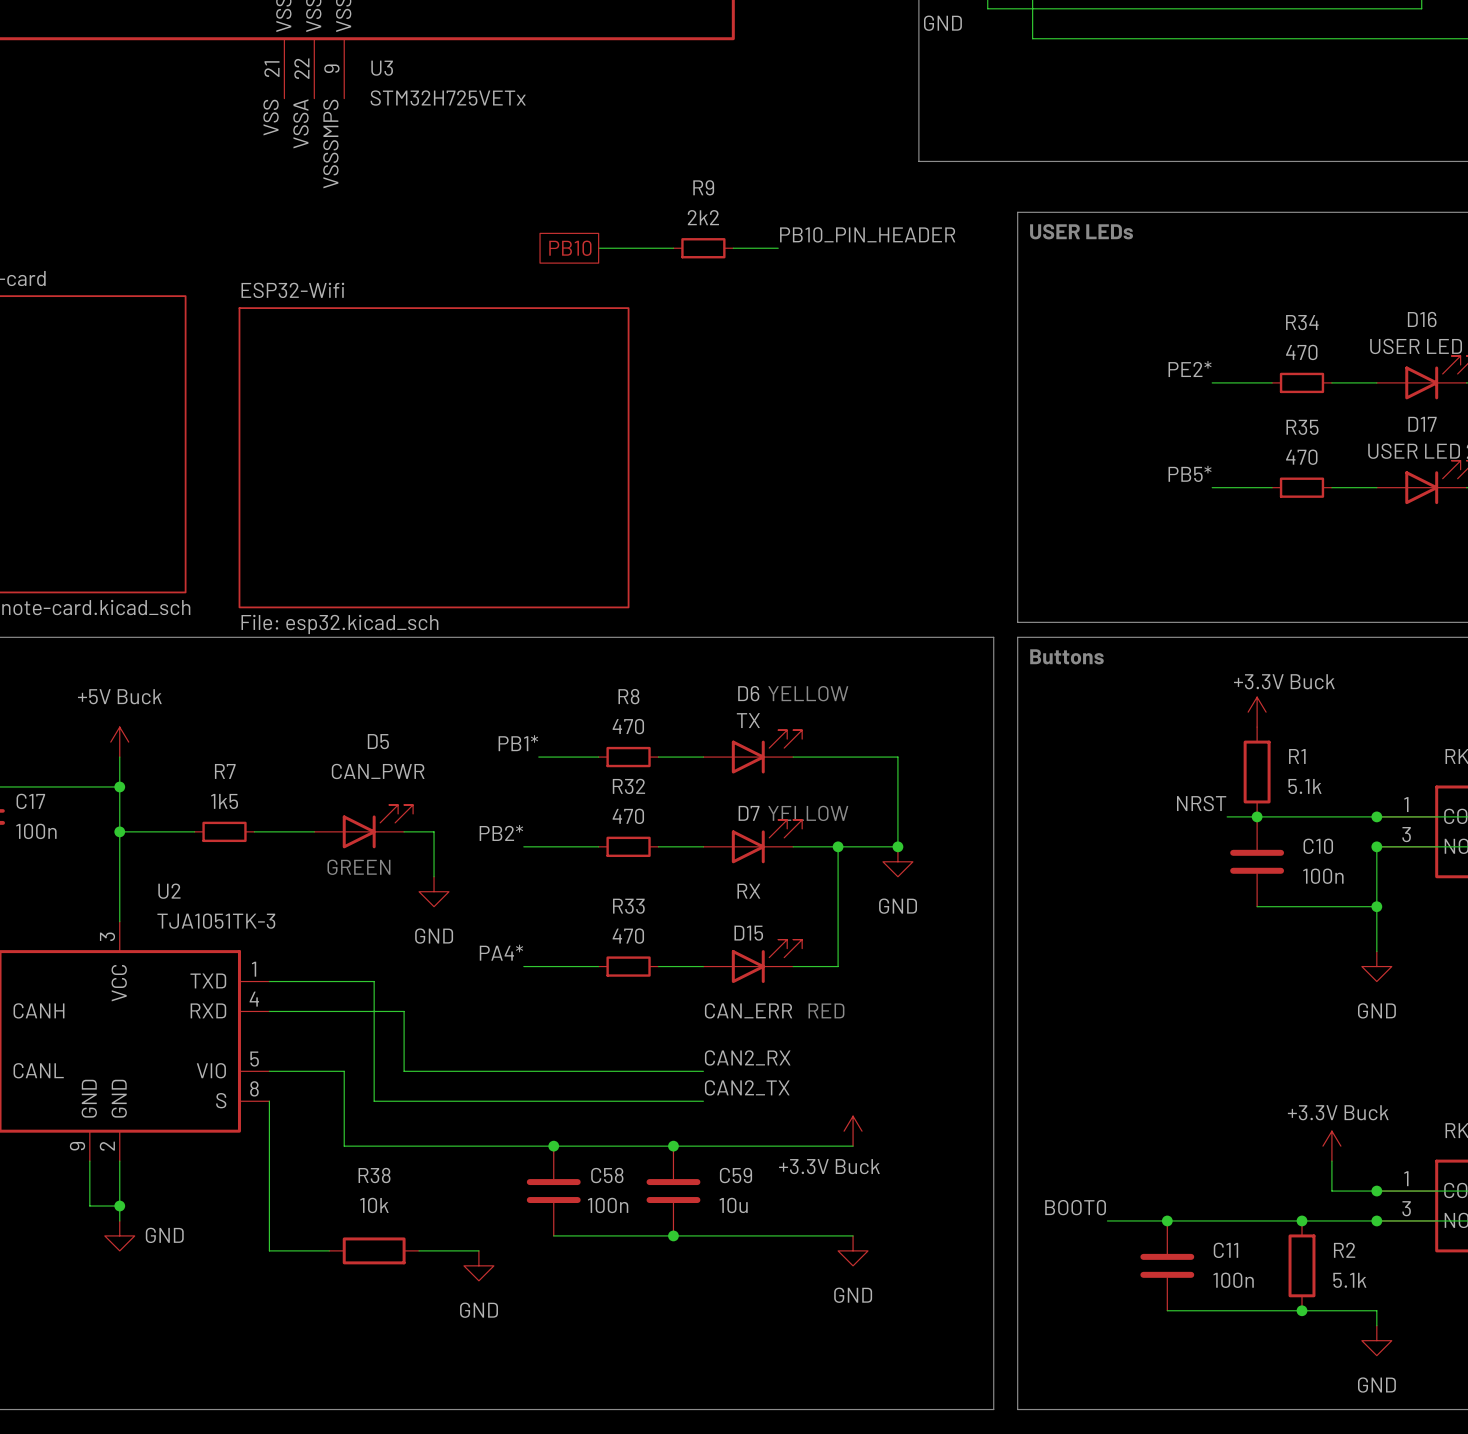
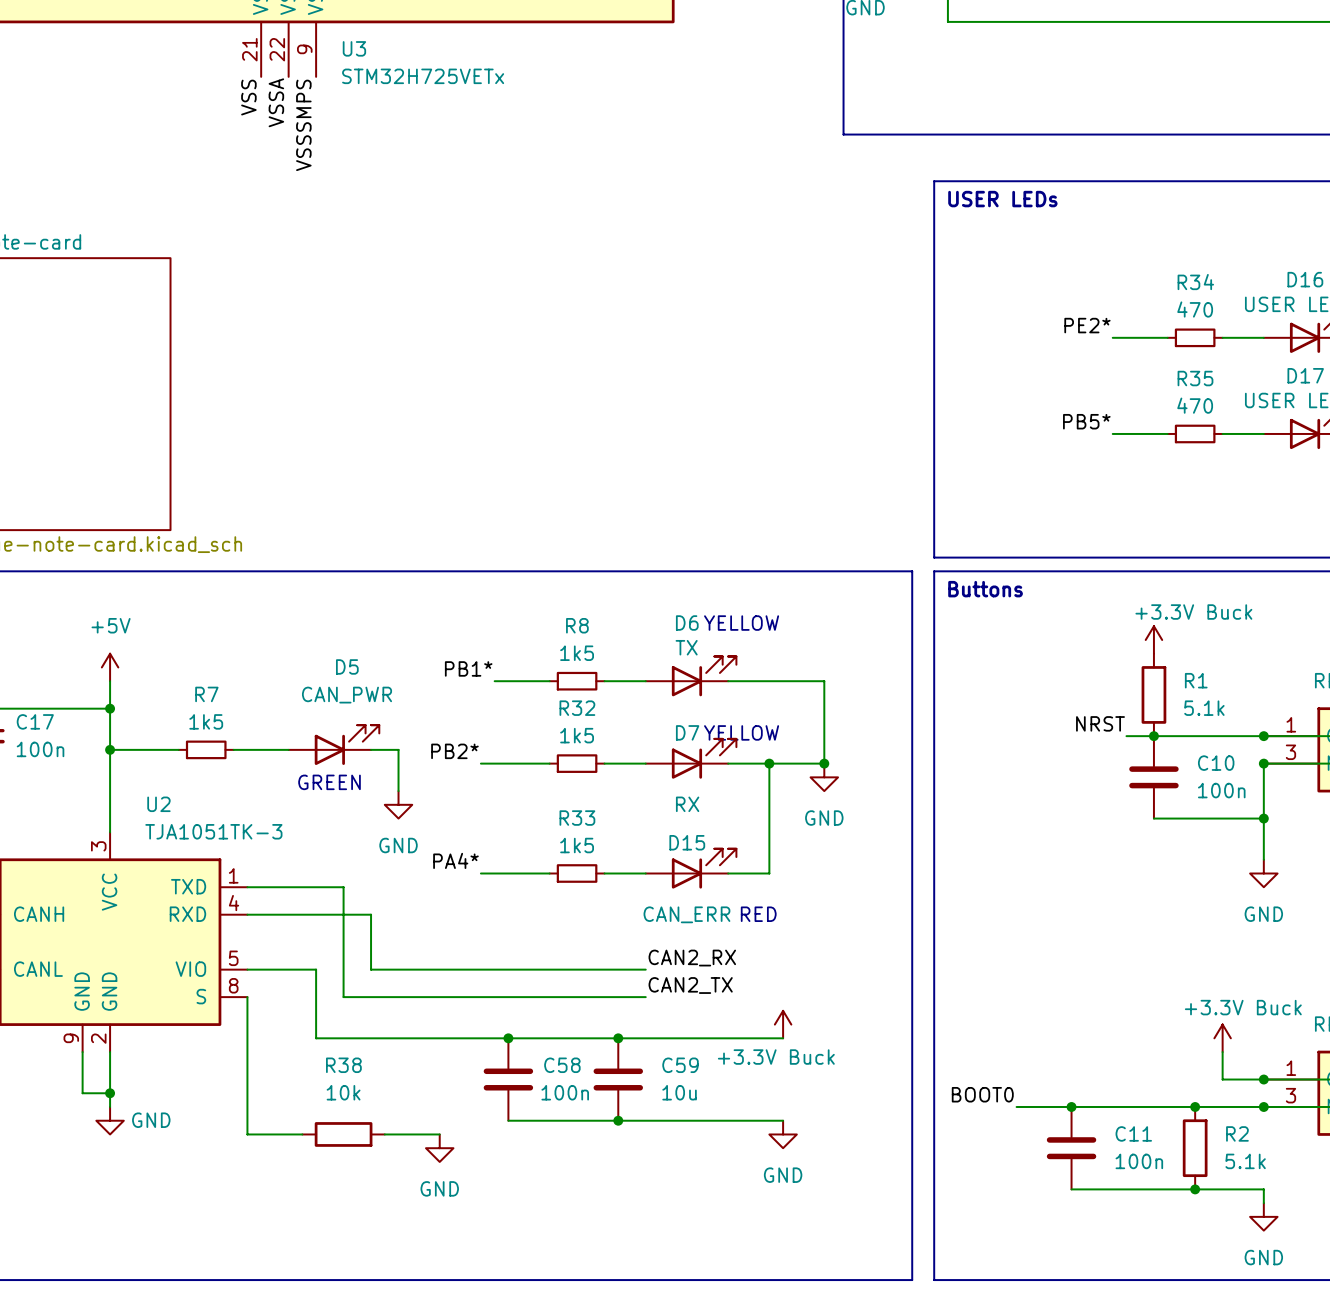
label: PB10_PIN_HEADER (867, 234) -> none
global label: PB10 (570, 248) -> none
wire: (598, 248) (673, 248) -> none
R9: 2k2 (703, 248) -> none
wire: (733, 248) (778, 248) -> none
sheet ESP32-Wifi: File: esp32.kicad_sch (434, 457) -> none
R8 value: 470 (628, 726) -> 1k5 (577, 653)
power symbol: +5V Buck (119, 742) -> +5V (110, 667)
R32 value: 470 (628, 816) -> 1k5 (577, 735)
R33 value: 470 (628, 936) -> 1k5 (577, 845)

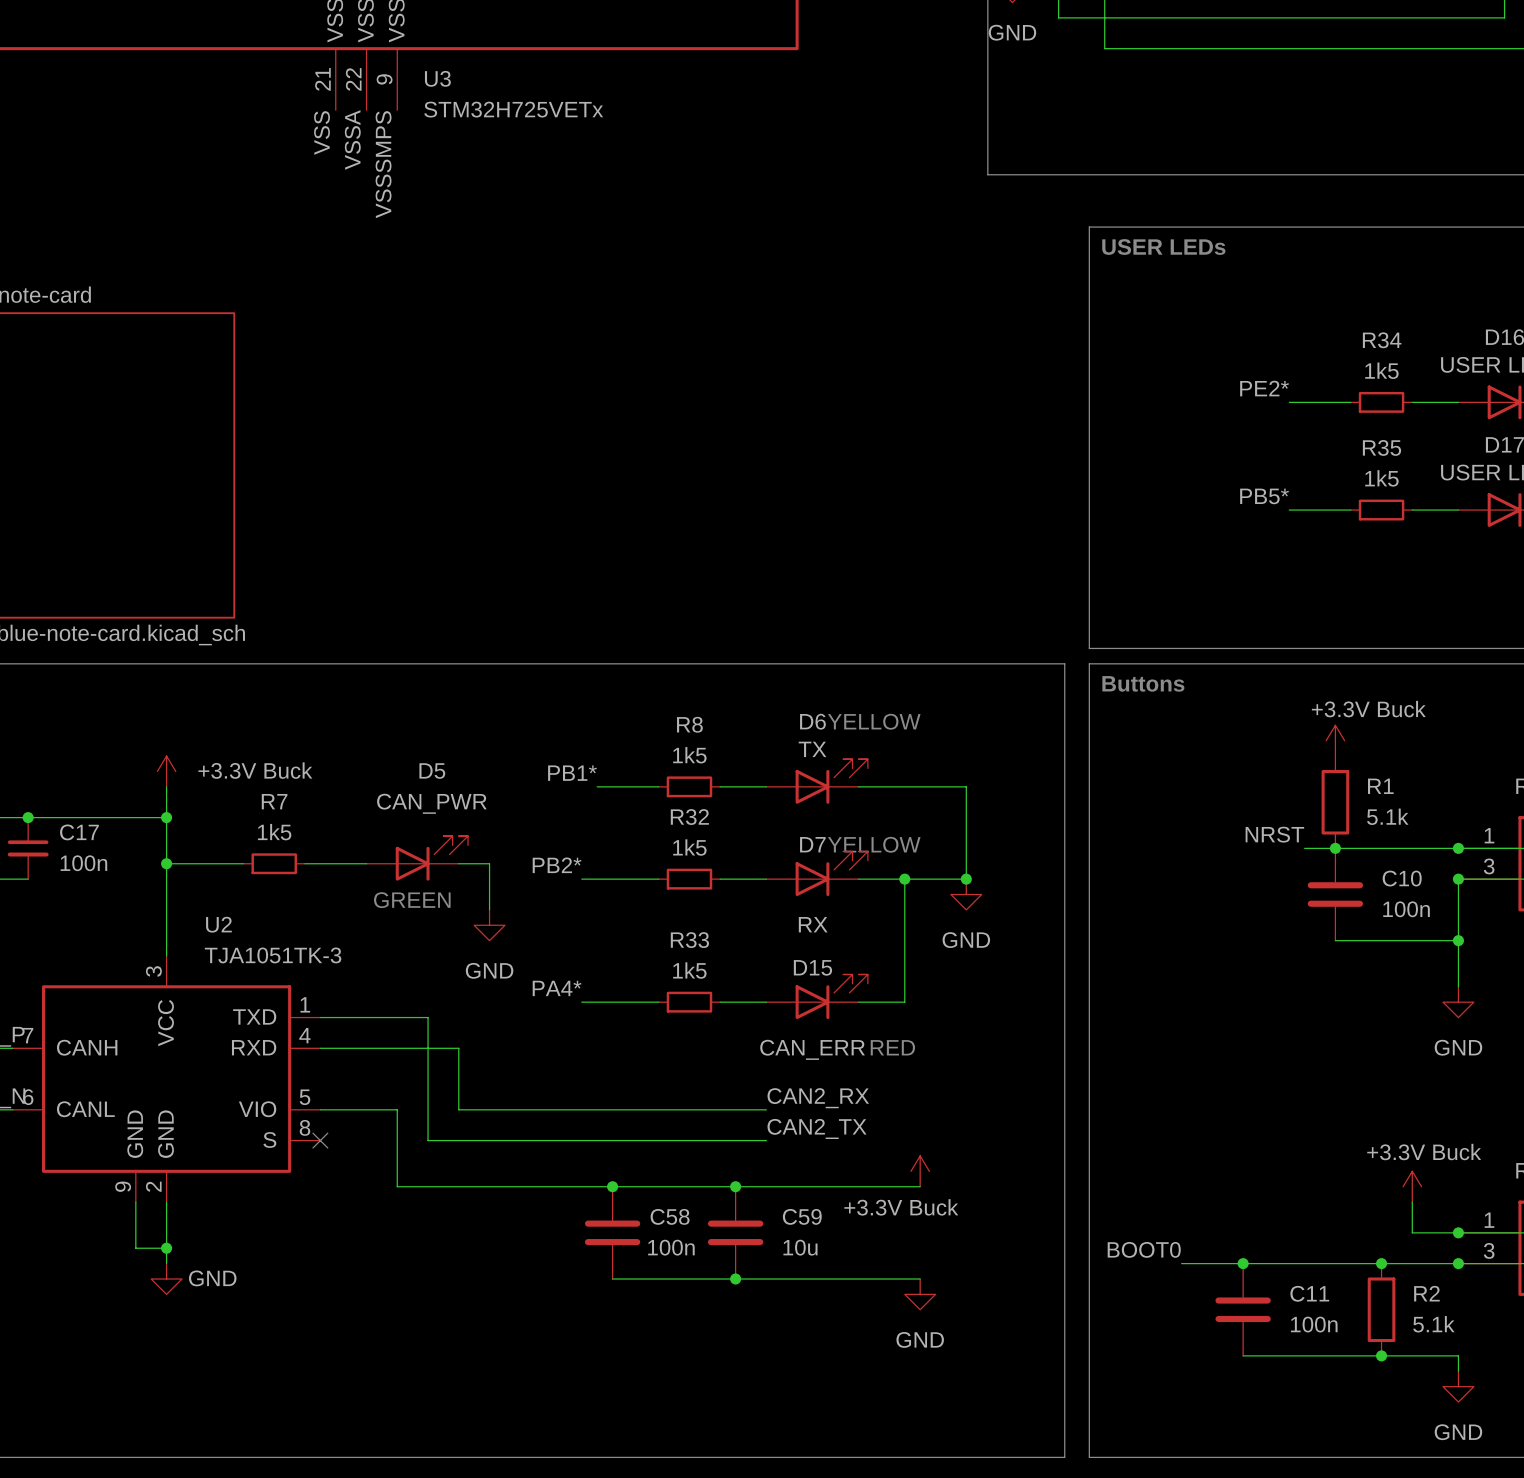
R34 value: 470 (1195, 309) -> 1k5 (1381, 370)
R35 value: 470 (1195, 405) -> 1k5 (1381, 478)
power symbol: +5V (110, 667) -> +3.3V Buck (166, 771)
wire: (247, 997) (247, 1134) (302, 1134) -> none
no-connect mark: none -> (320, 1140)
R38: 10k (343, 1134) -> none
wire: (384, 1134) (439, 1134) -> none
power symbol: GND (439, 1148) -> none

